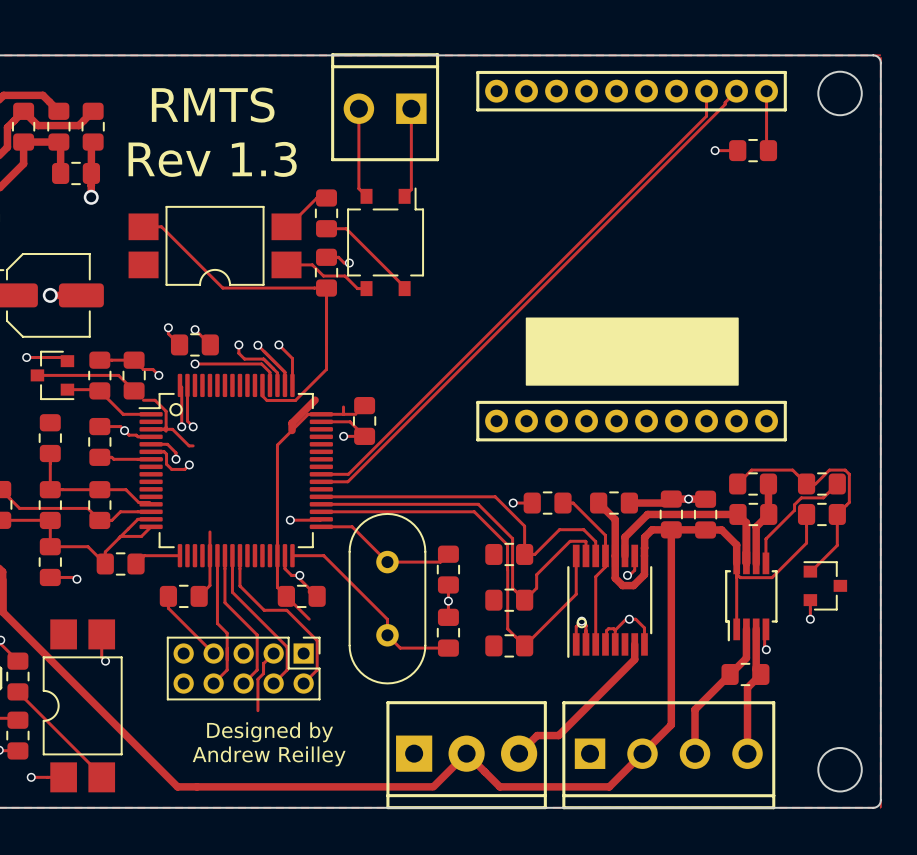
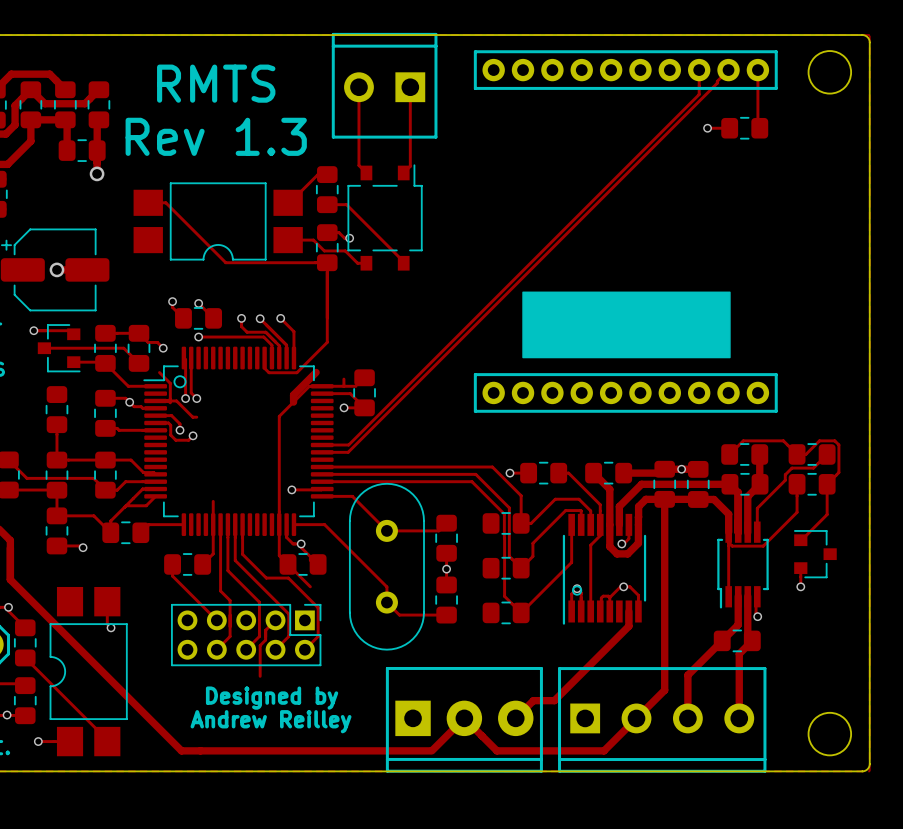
track: (143, 400) (155, 400) -> none

